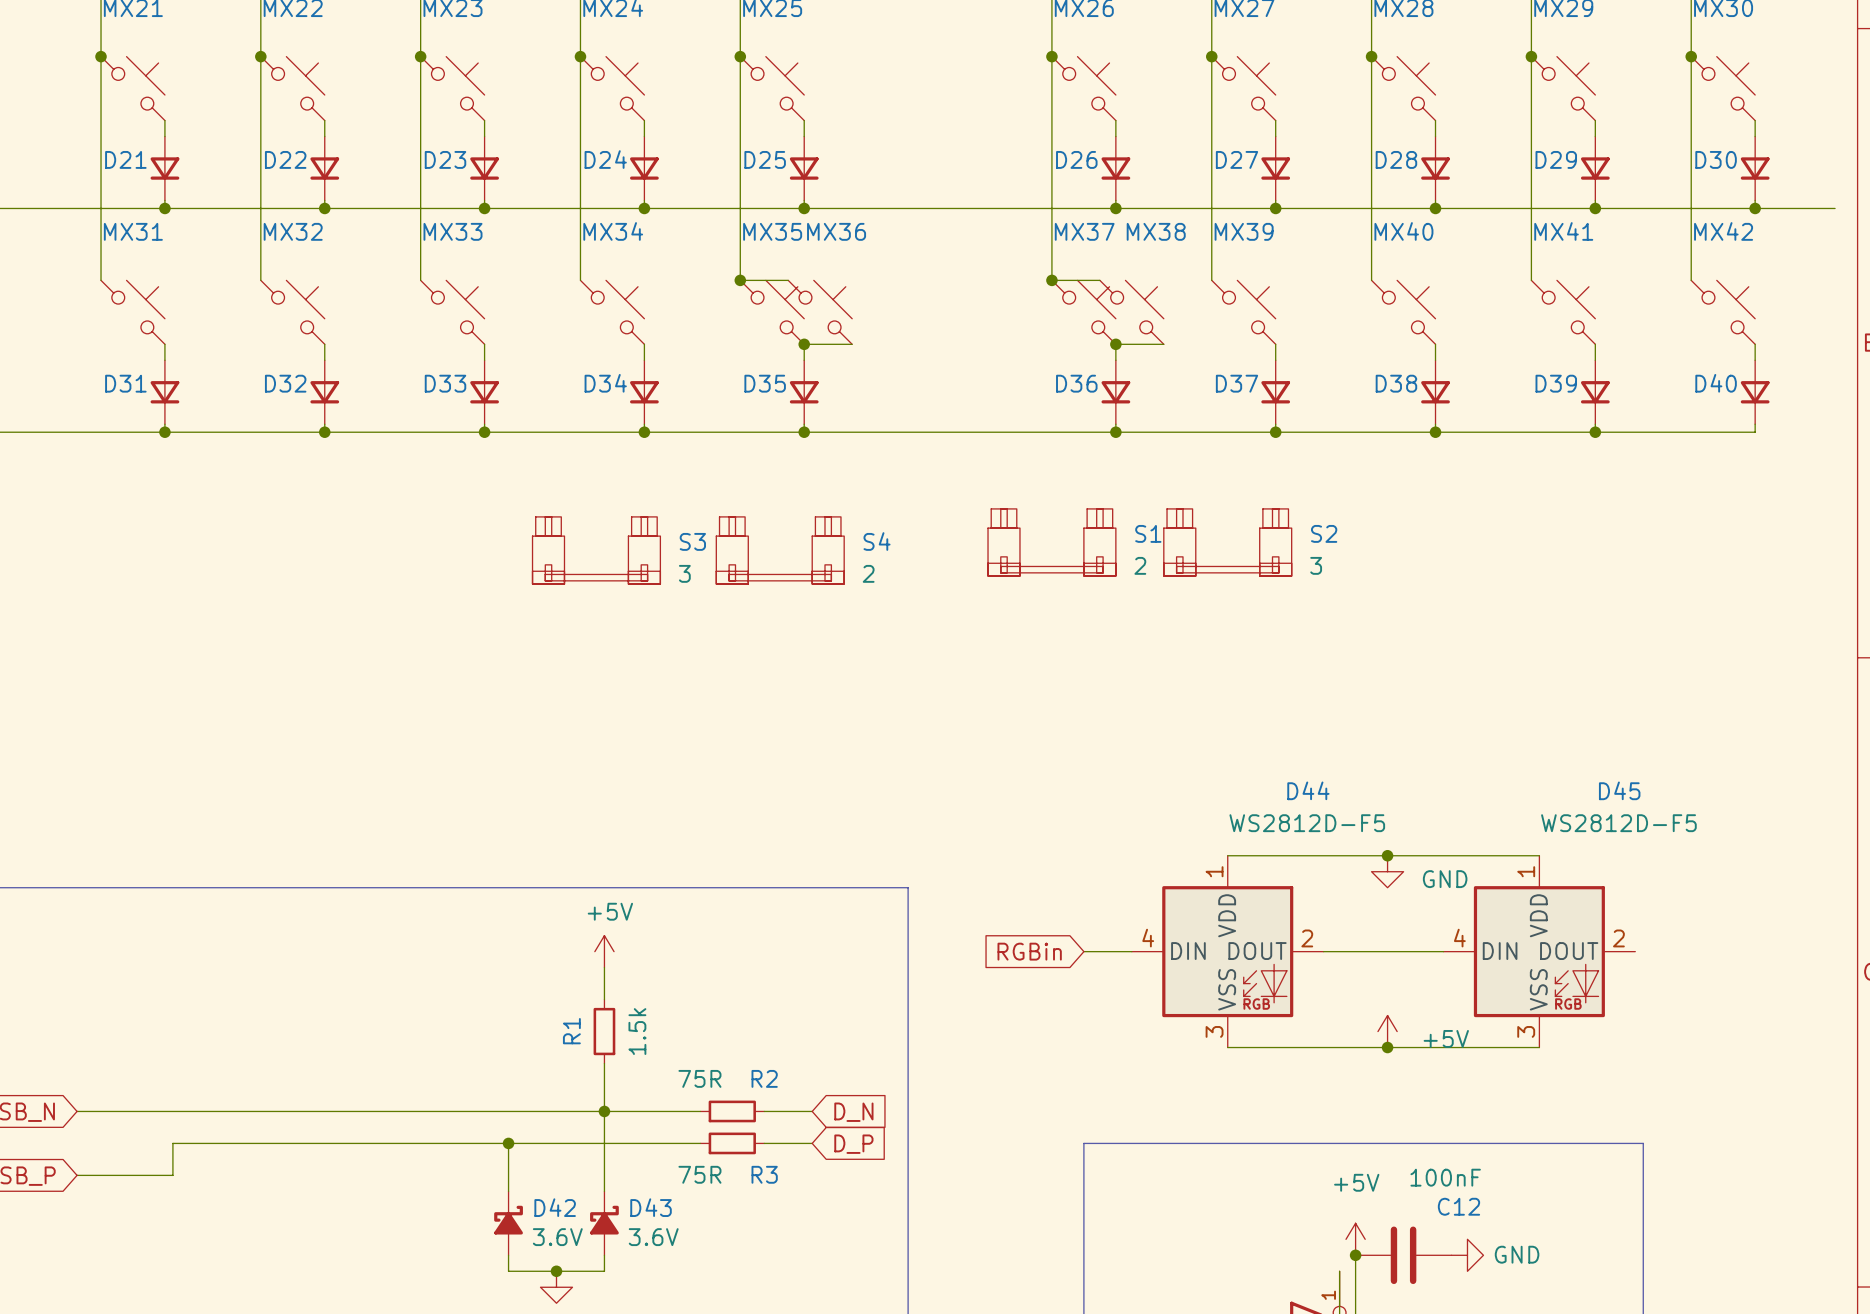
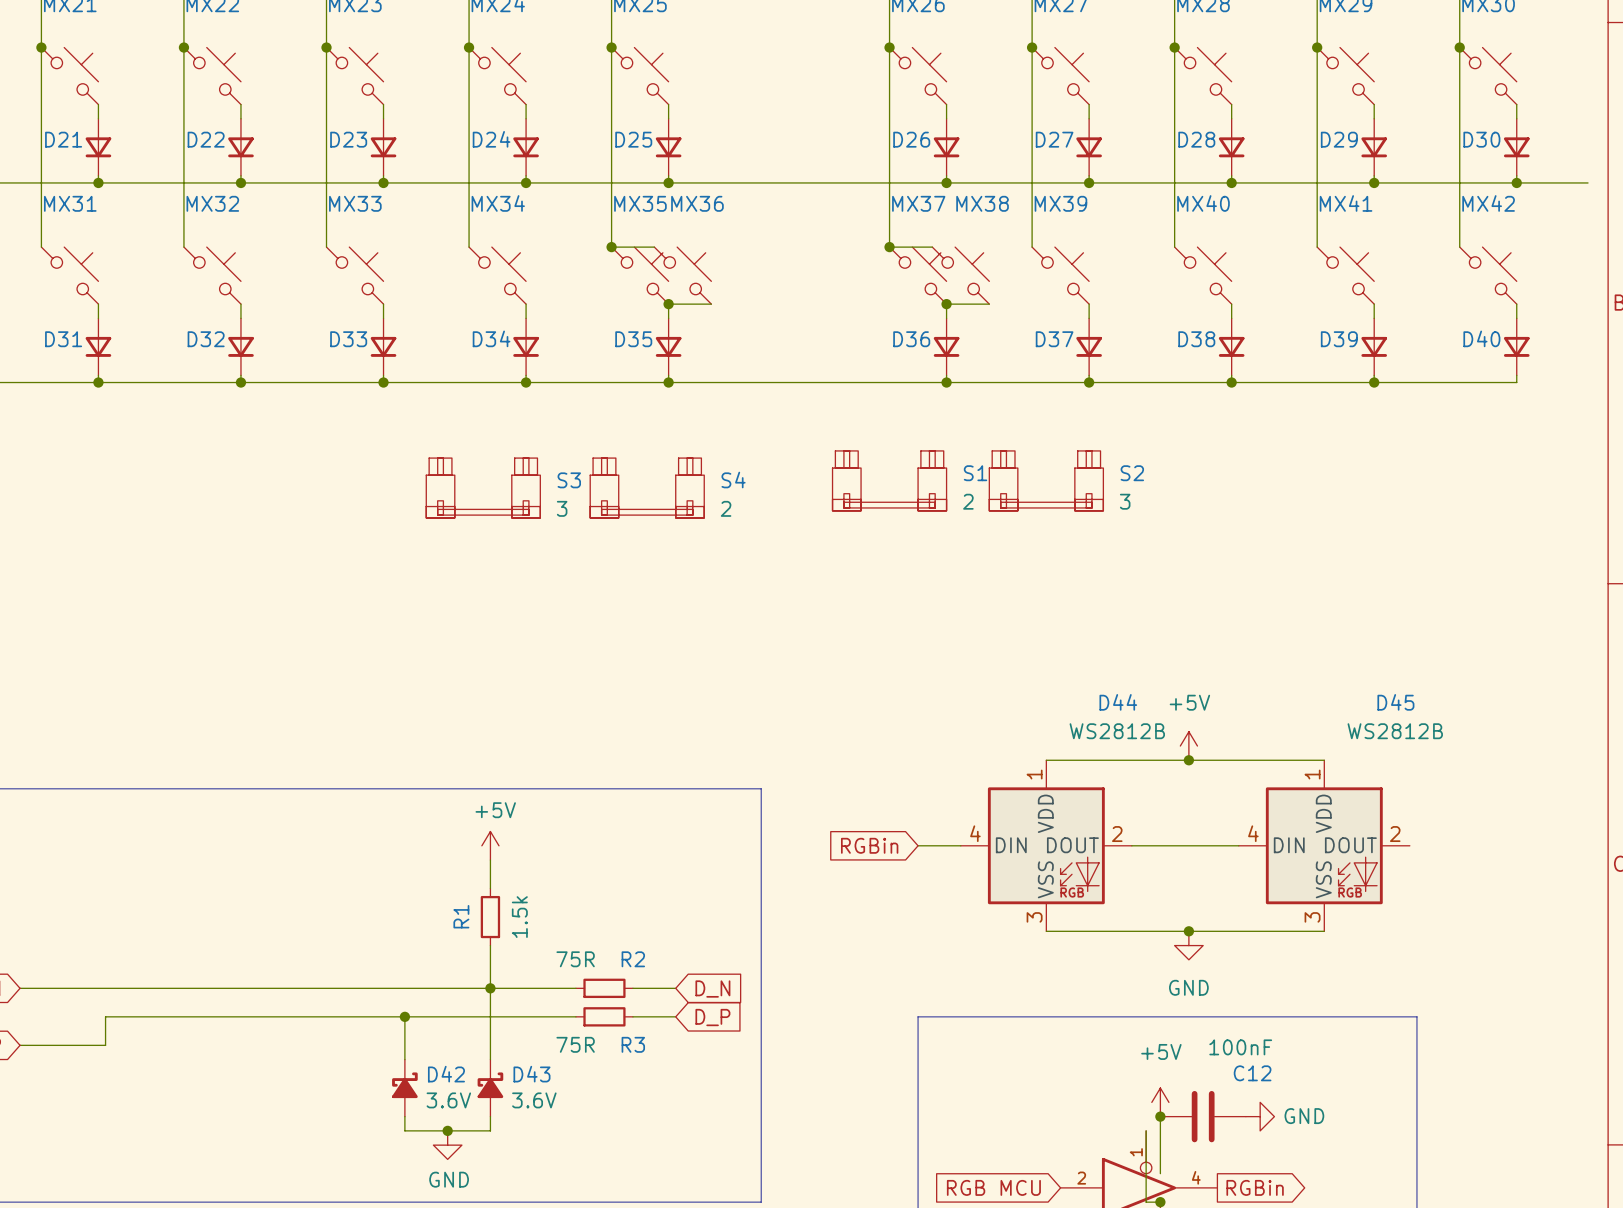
D44 value: WS2812D-F5 (1307, 823) -> WS2812B (1117, 731)
D45 value: WS2812D-F5 (1618, 823) -> WS2812B (1395, 731)
power symbol position: GND (1387, 871) -> GND (1188, 945)
power symbol text position: GND (1445, 879) -> GND (1188, 987)
power symbol position: +5V (1387, 1031) -> +5V (1188, 746)
power symbol text position: +5V (1446, 1038) -> +5V (1189, 702)

